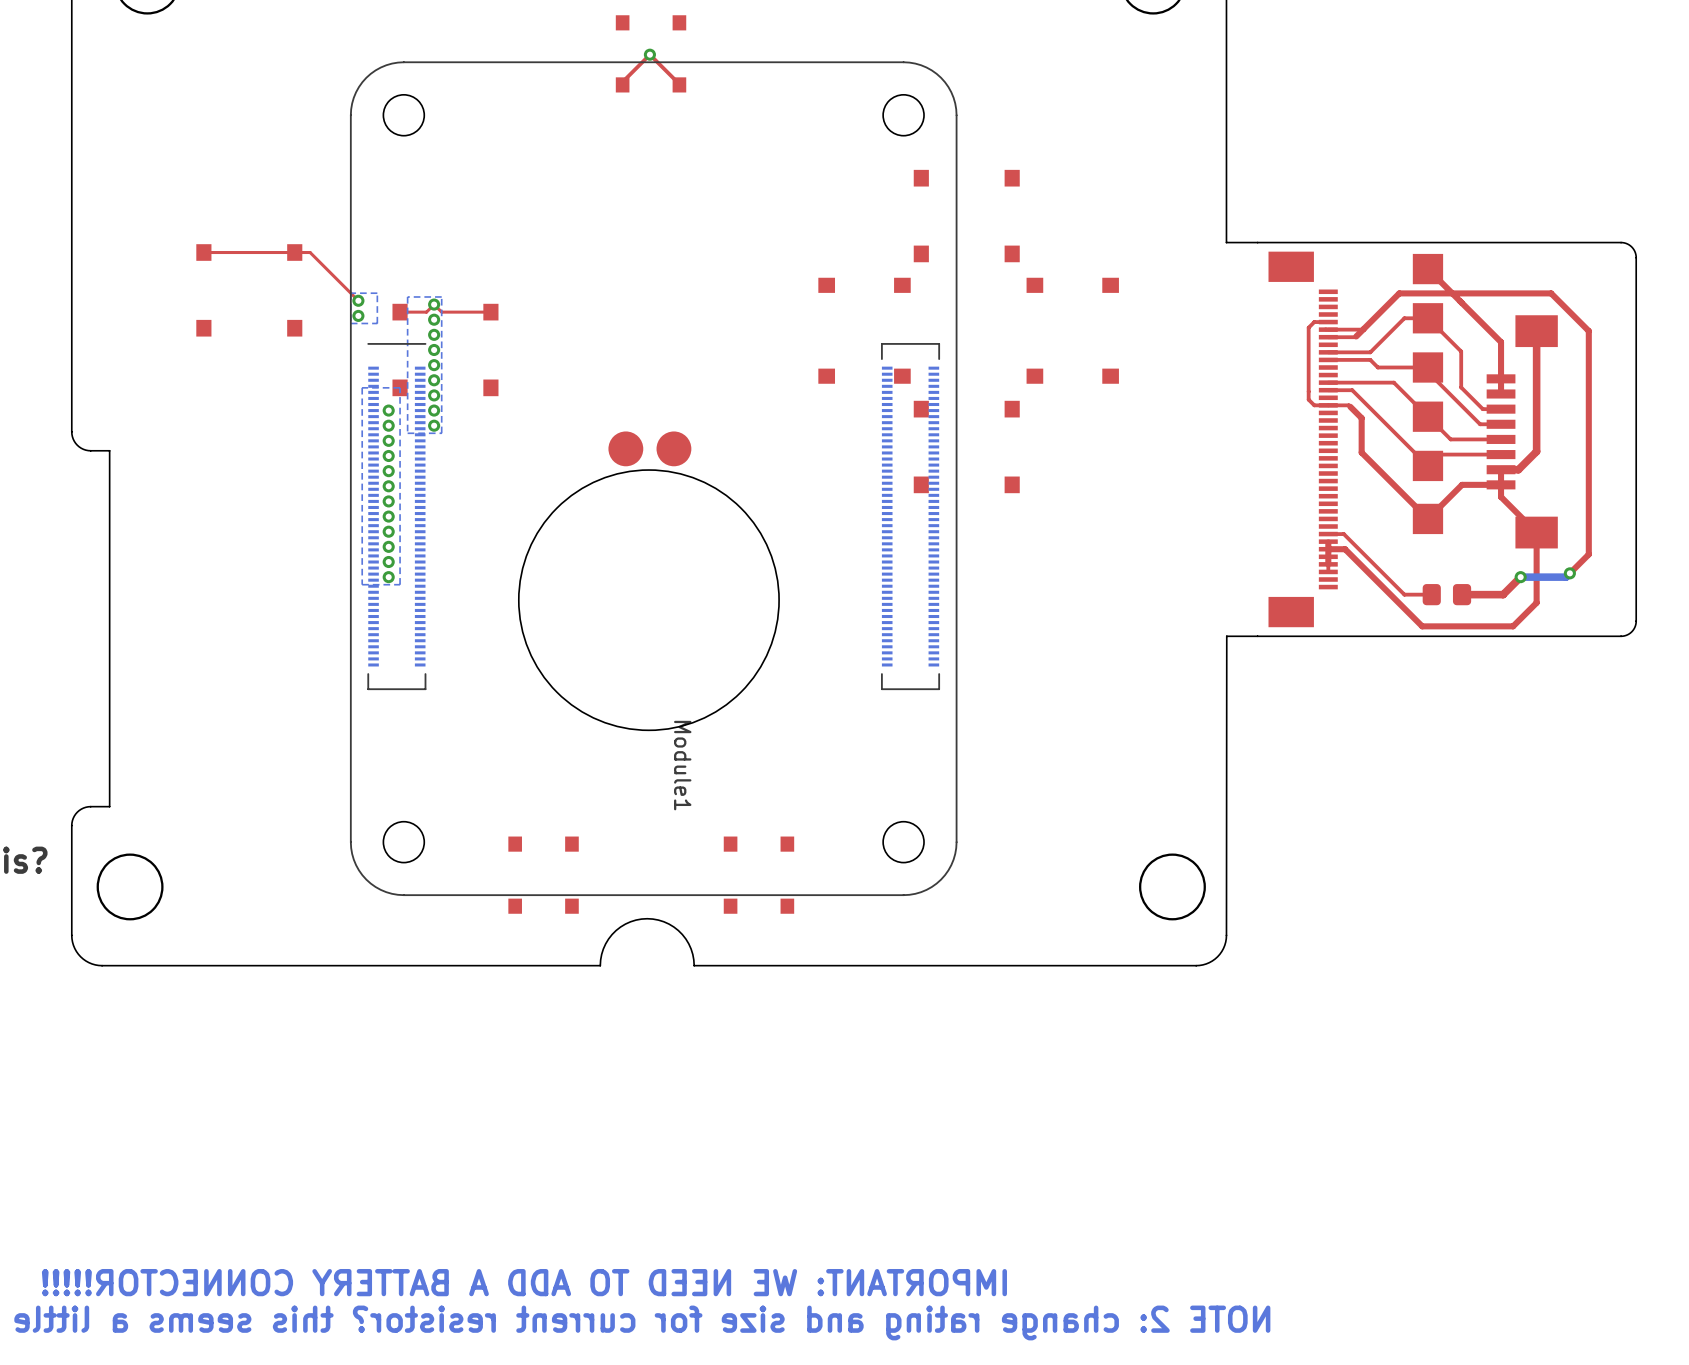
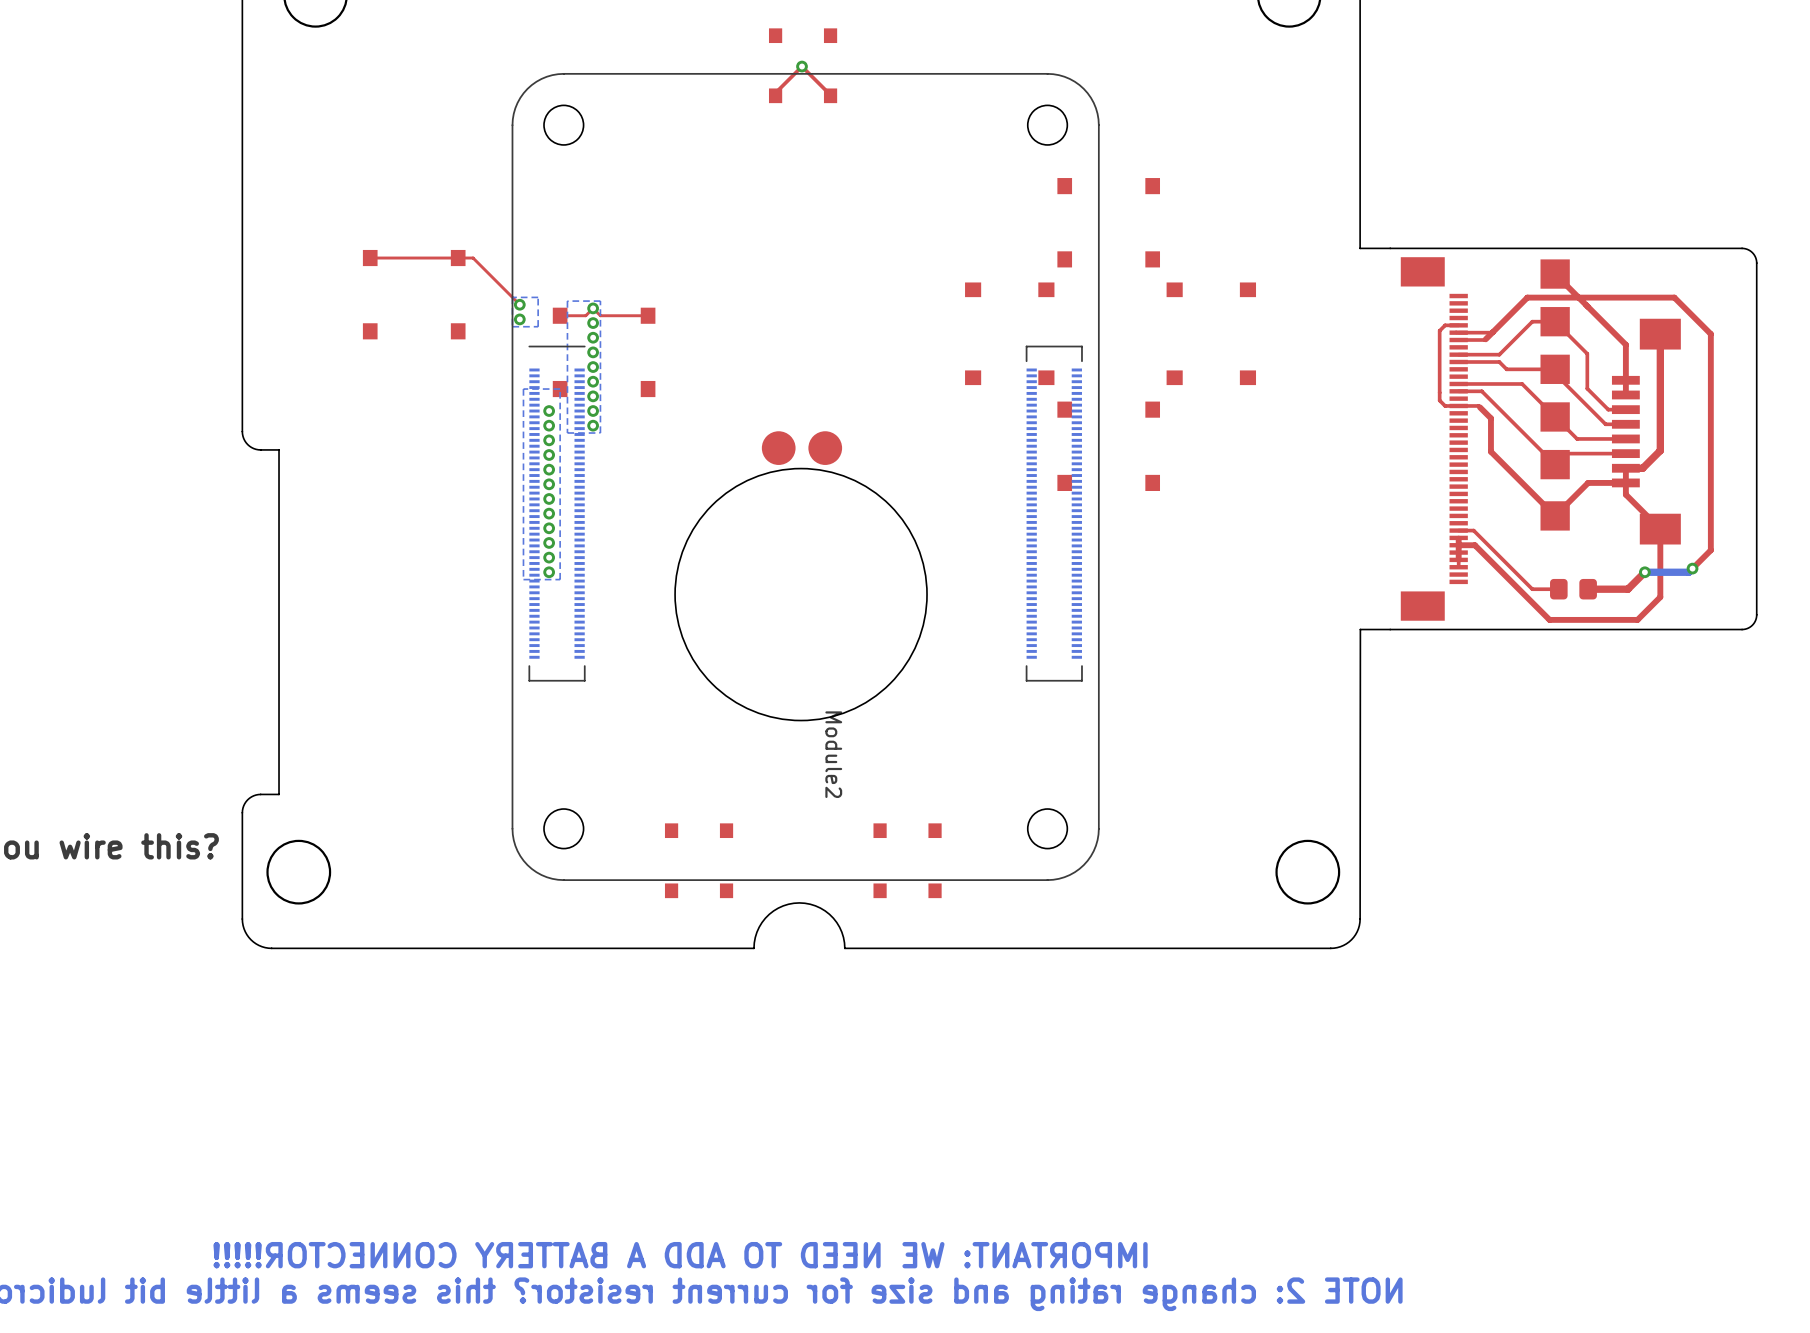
Module1 name: Module1 (682, 765) -> Module2 (833, 754)

